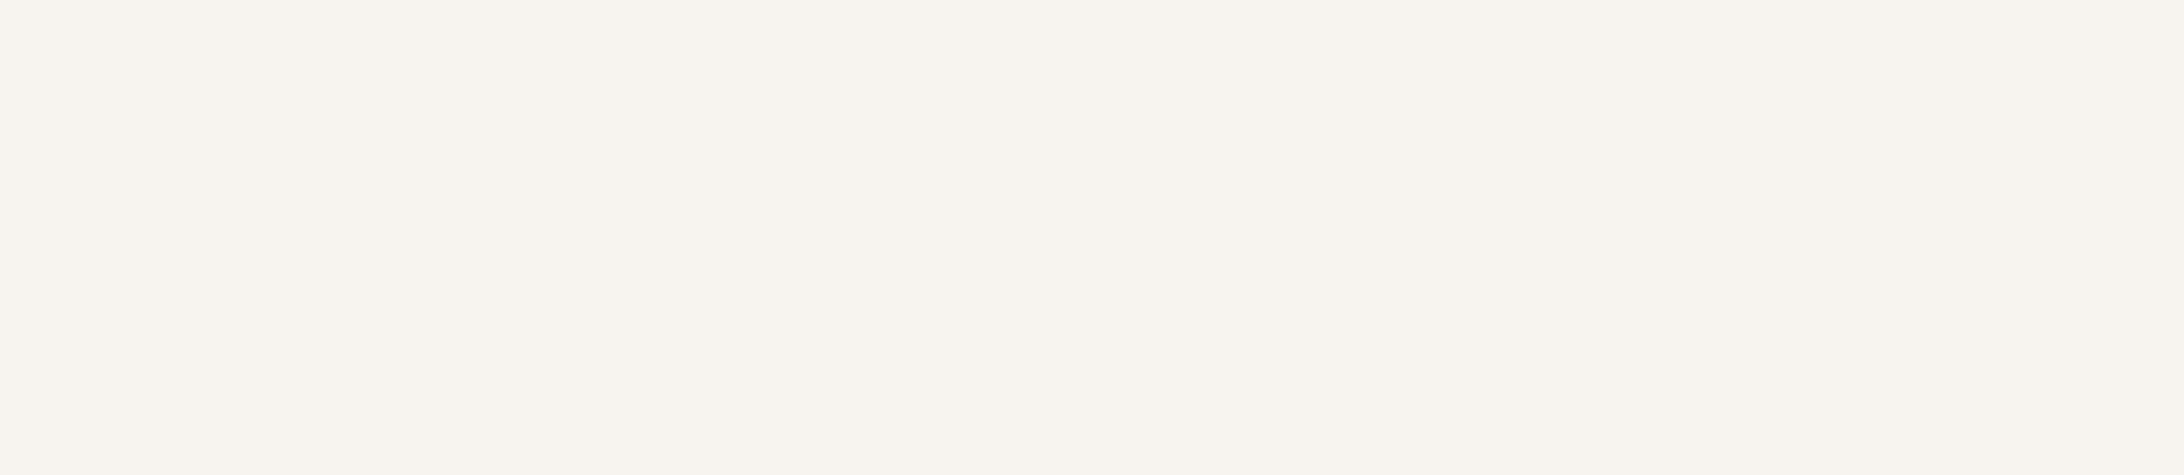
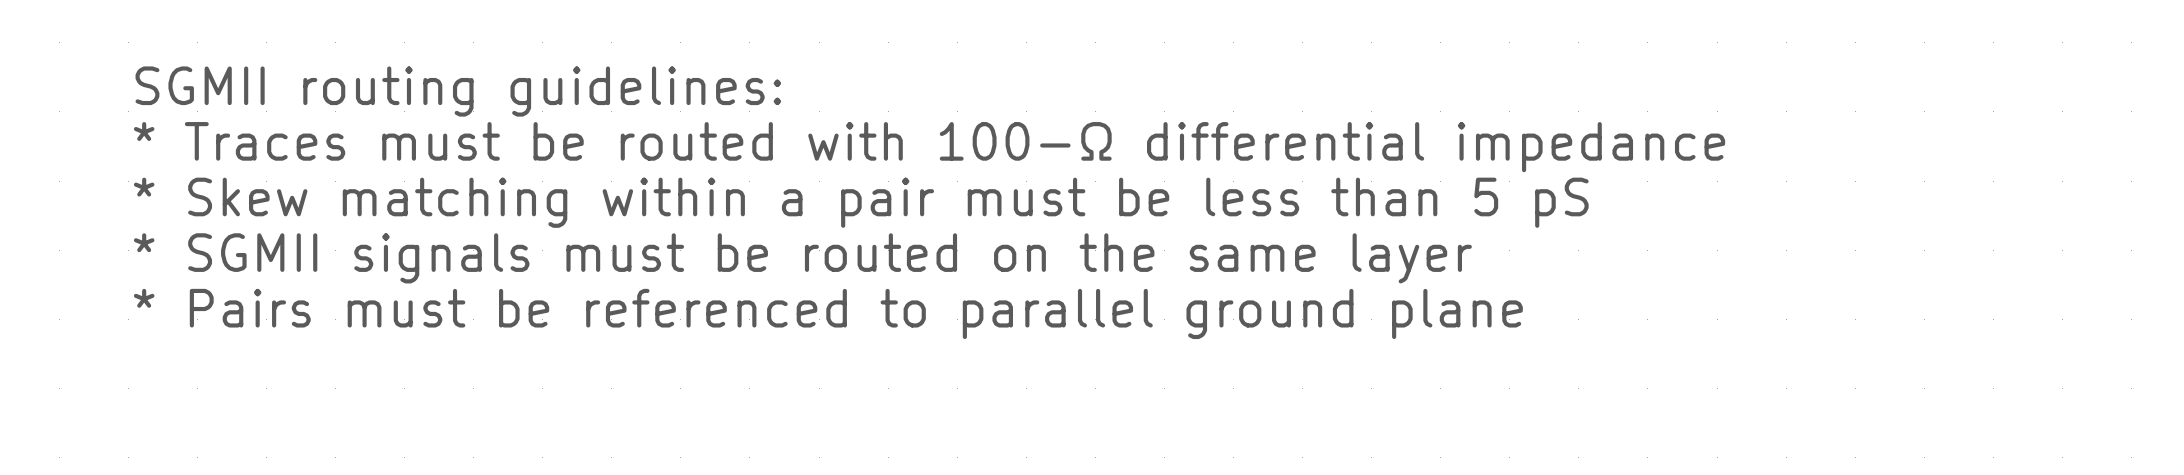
text: none -> SGMII routing guidelines: (458, 91)
text: none -> * Traces must be routed with 100-Ω differential impedance (929, 147)
text: none -> * Skew matching within a pair must be less than 5 pS (861, 202)
text: none -> * SGMII signals must be routed on the same layer (802, 258)
text: none -> * Pairs must be referenced to parallel ground plane (828, 313)

